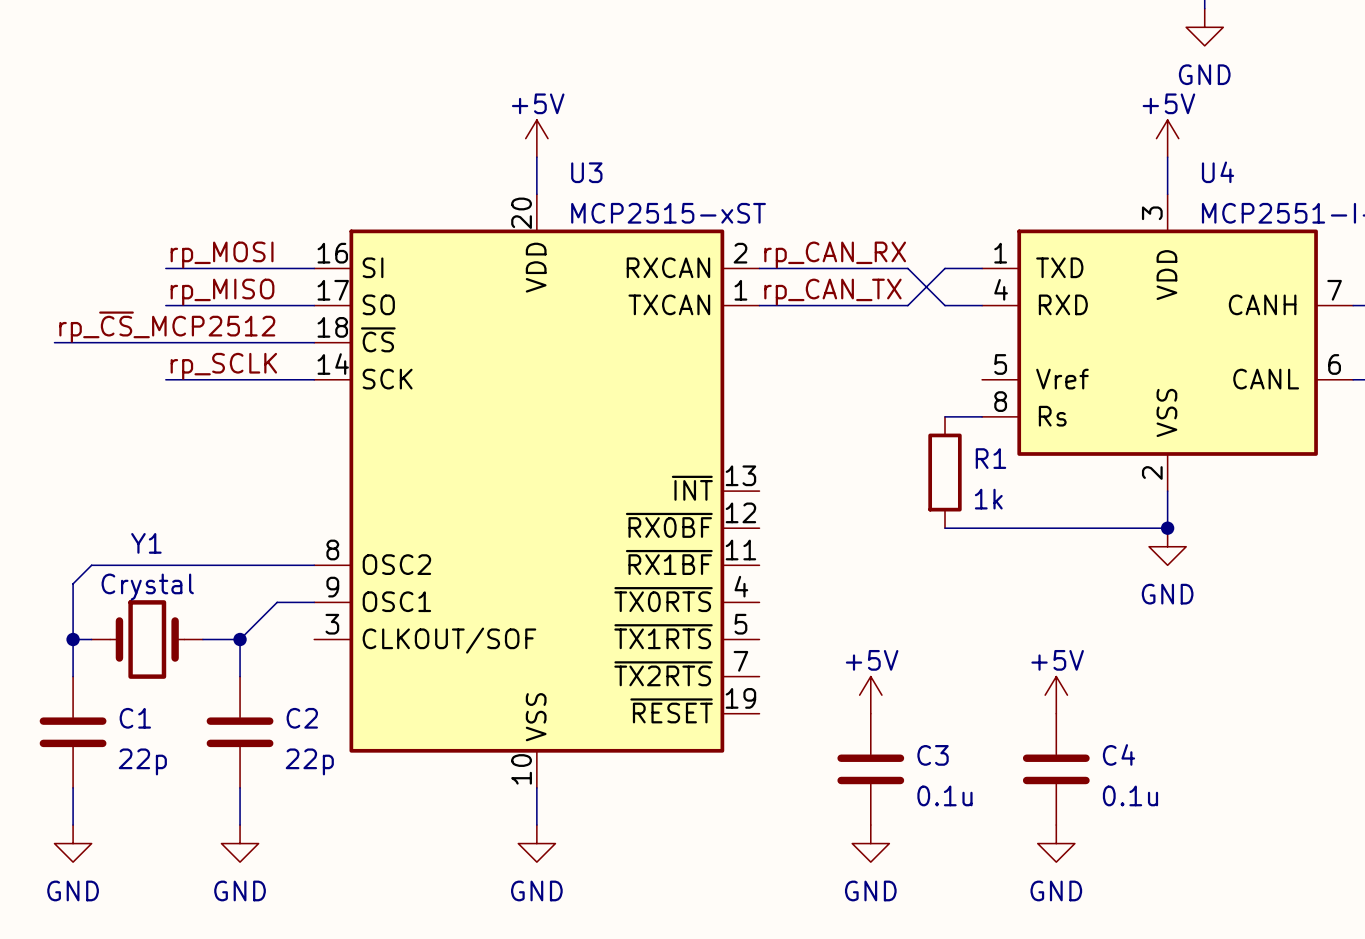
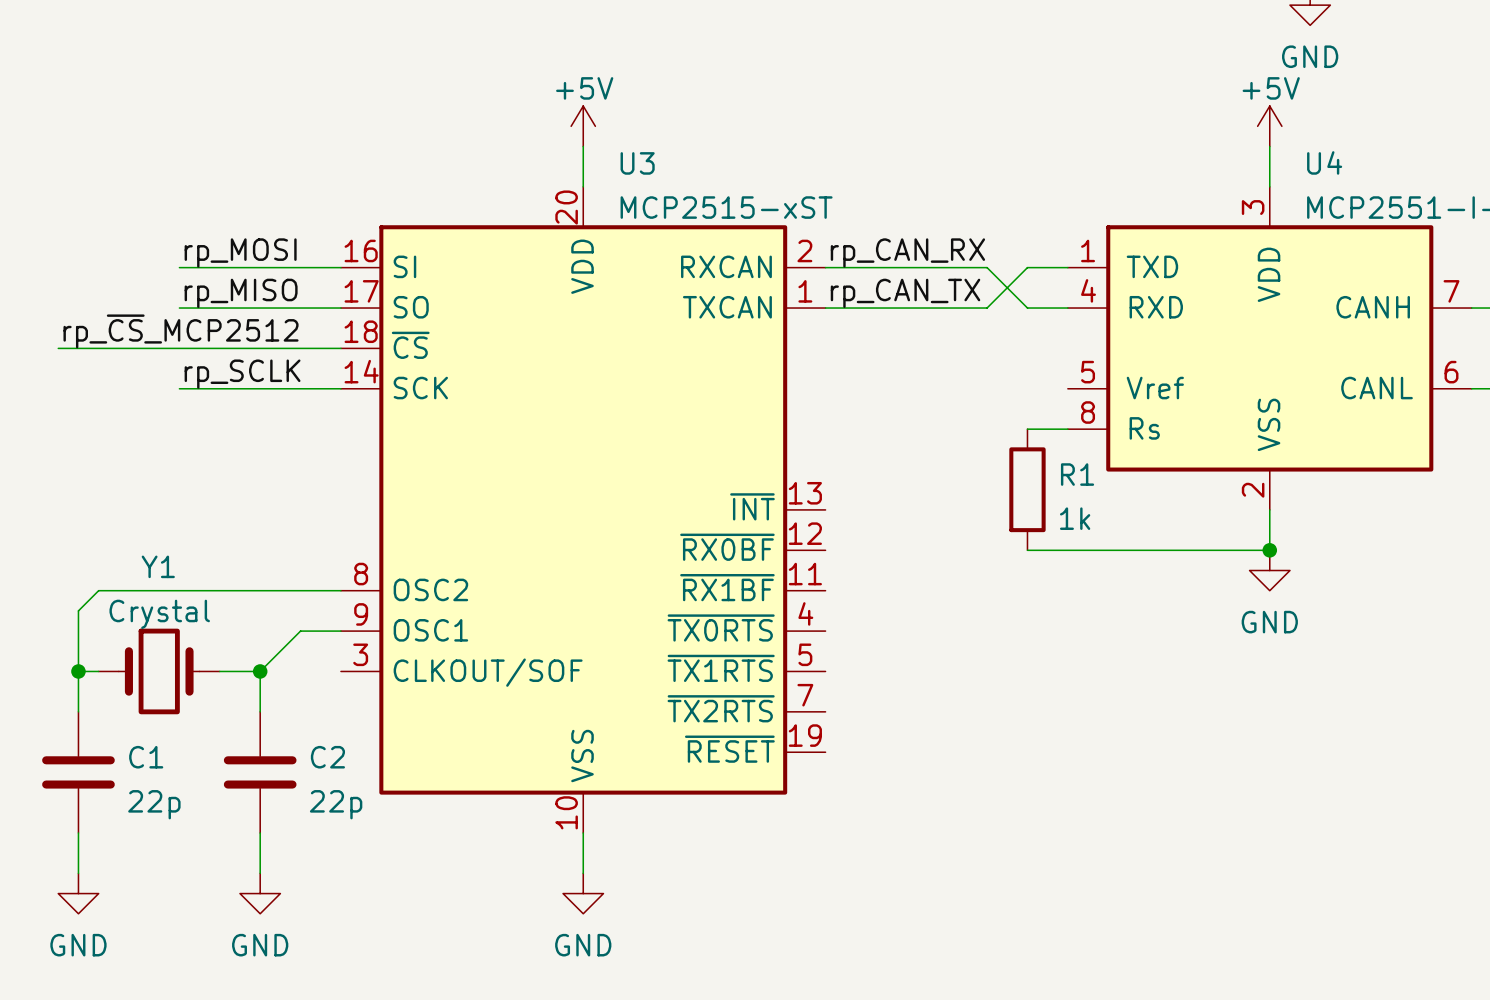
power symbol: +5V (870, 695) -> none
power symbol: +5V (1056, 695) -> none
C3: 0.1u (870, 769) -> none
C4: 0.1u (1056, 769) -> none
power symbol: GND (870, 843) -> none
power symbol: GND (1056, 843) -> none

